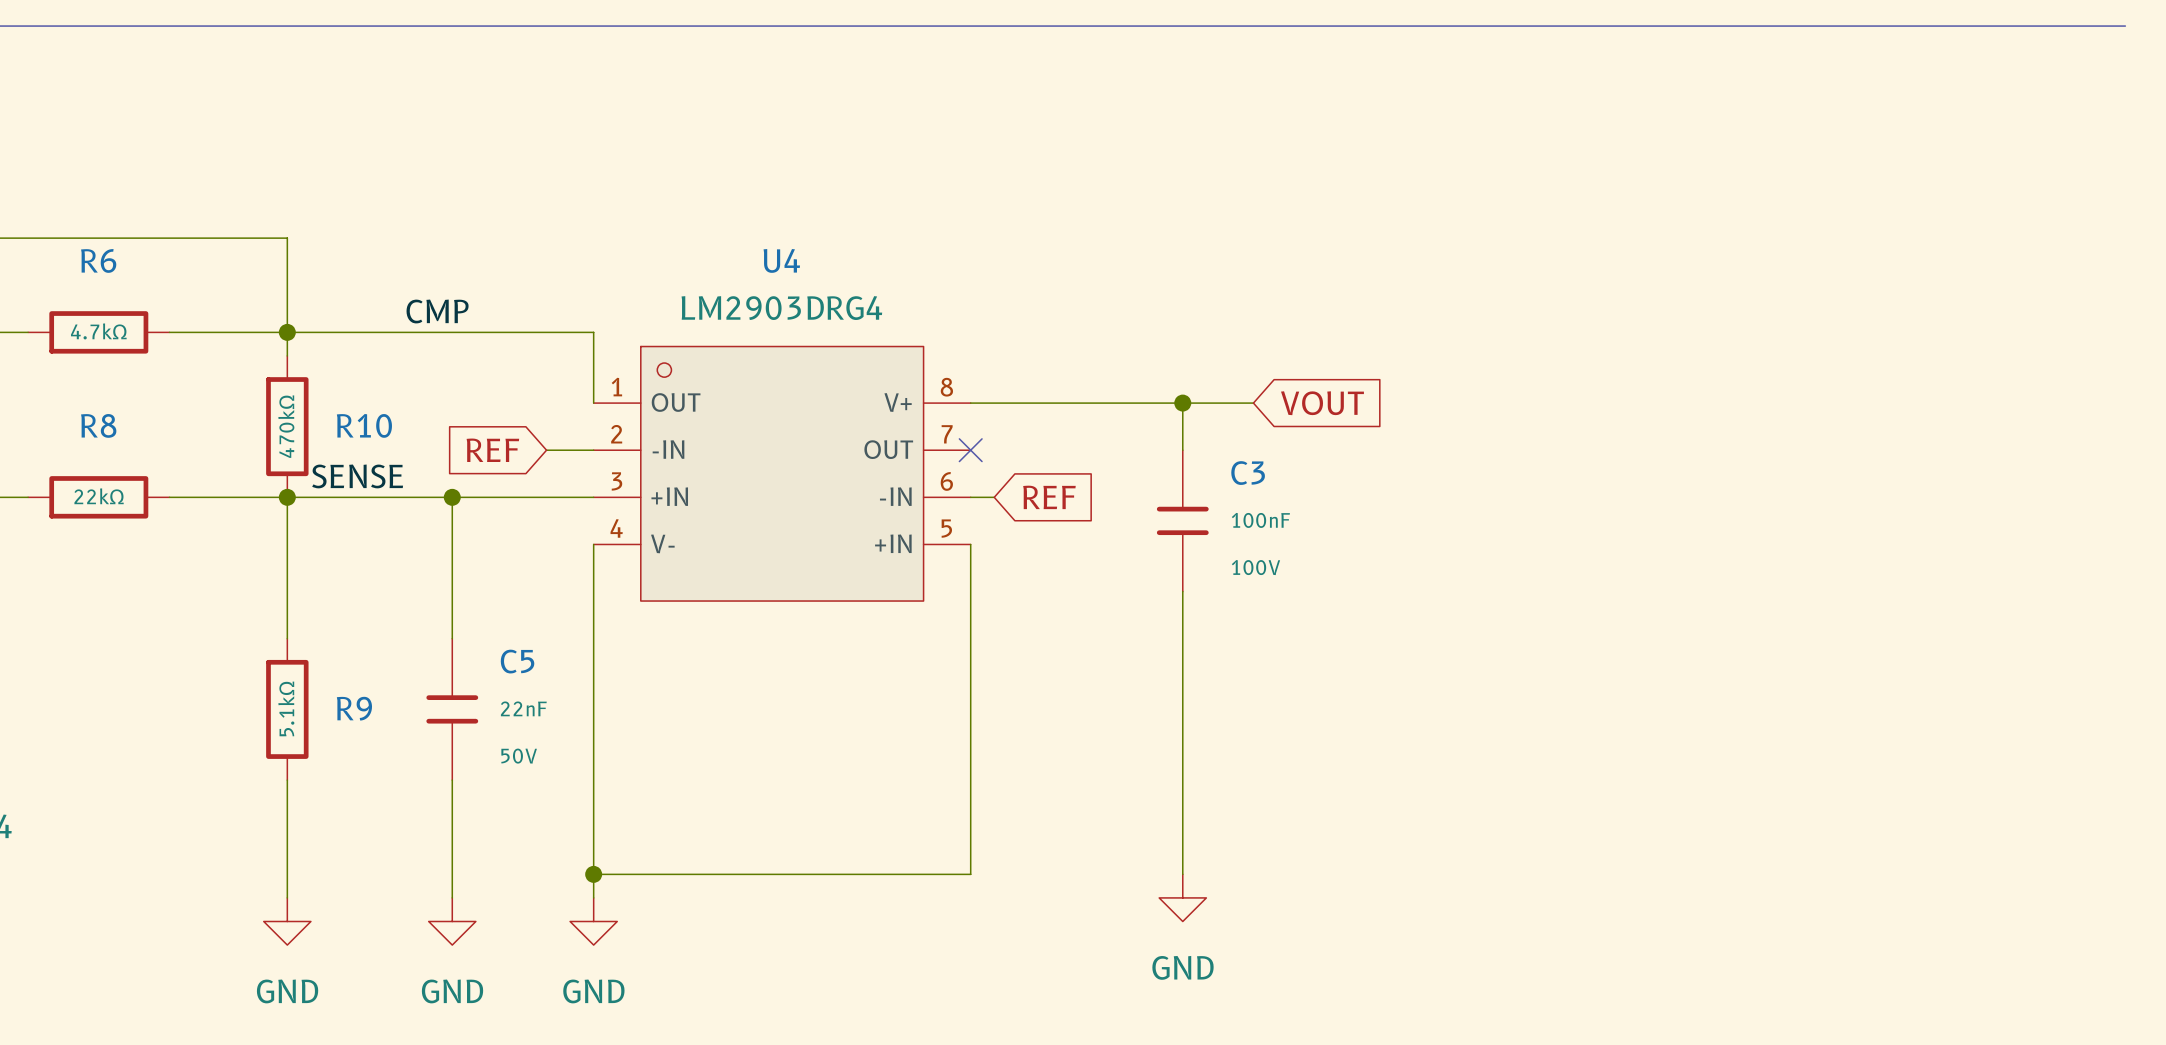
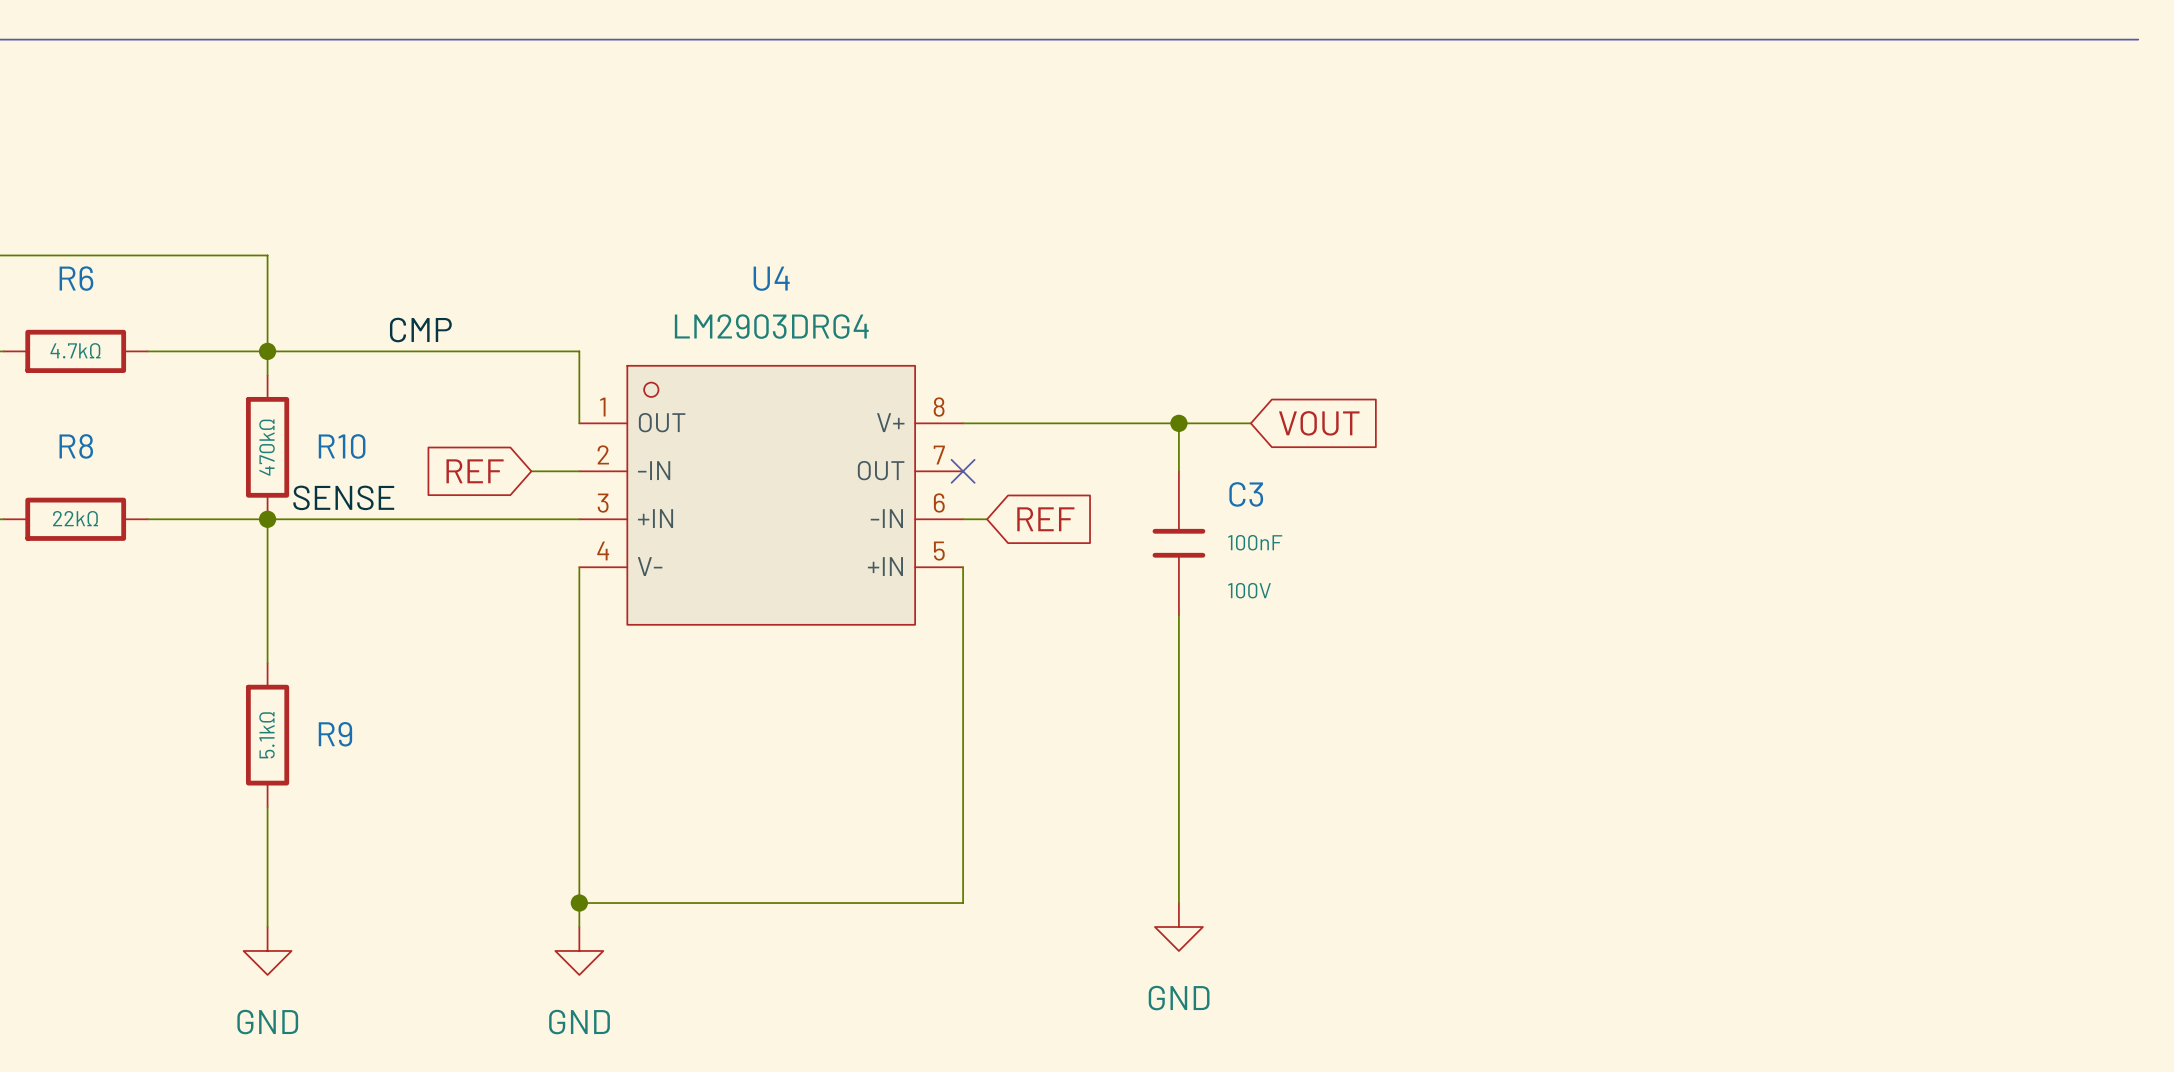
wire: (452, 497) (452, 638) -> none
junction: (452, 497) -> none
C5: 22nF (452, 709) -> none
wire: (452, 780) (452, 897) -> none
power symbol: GND (452, 921) -> none

